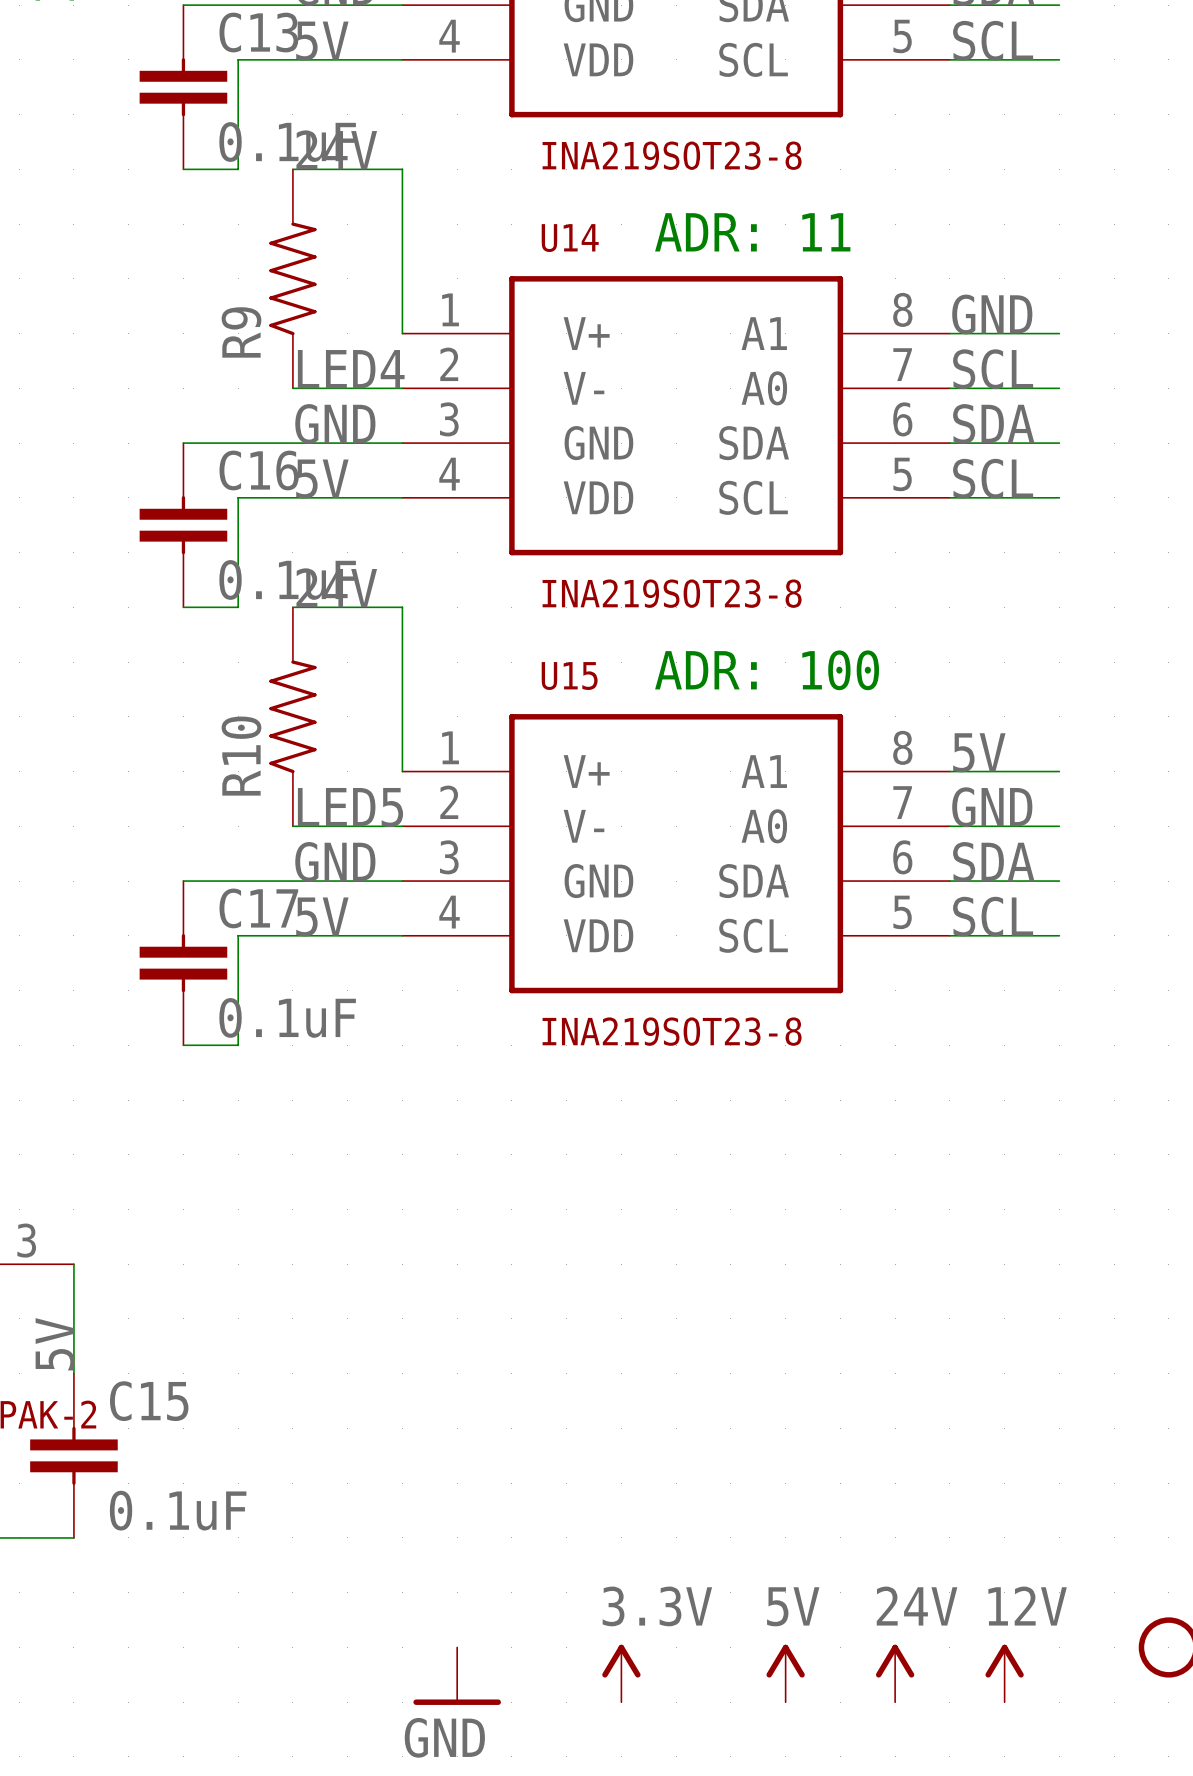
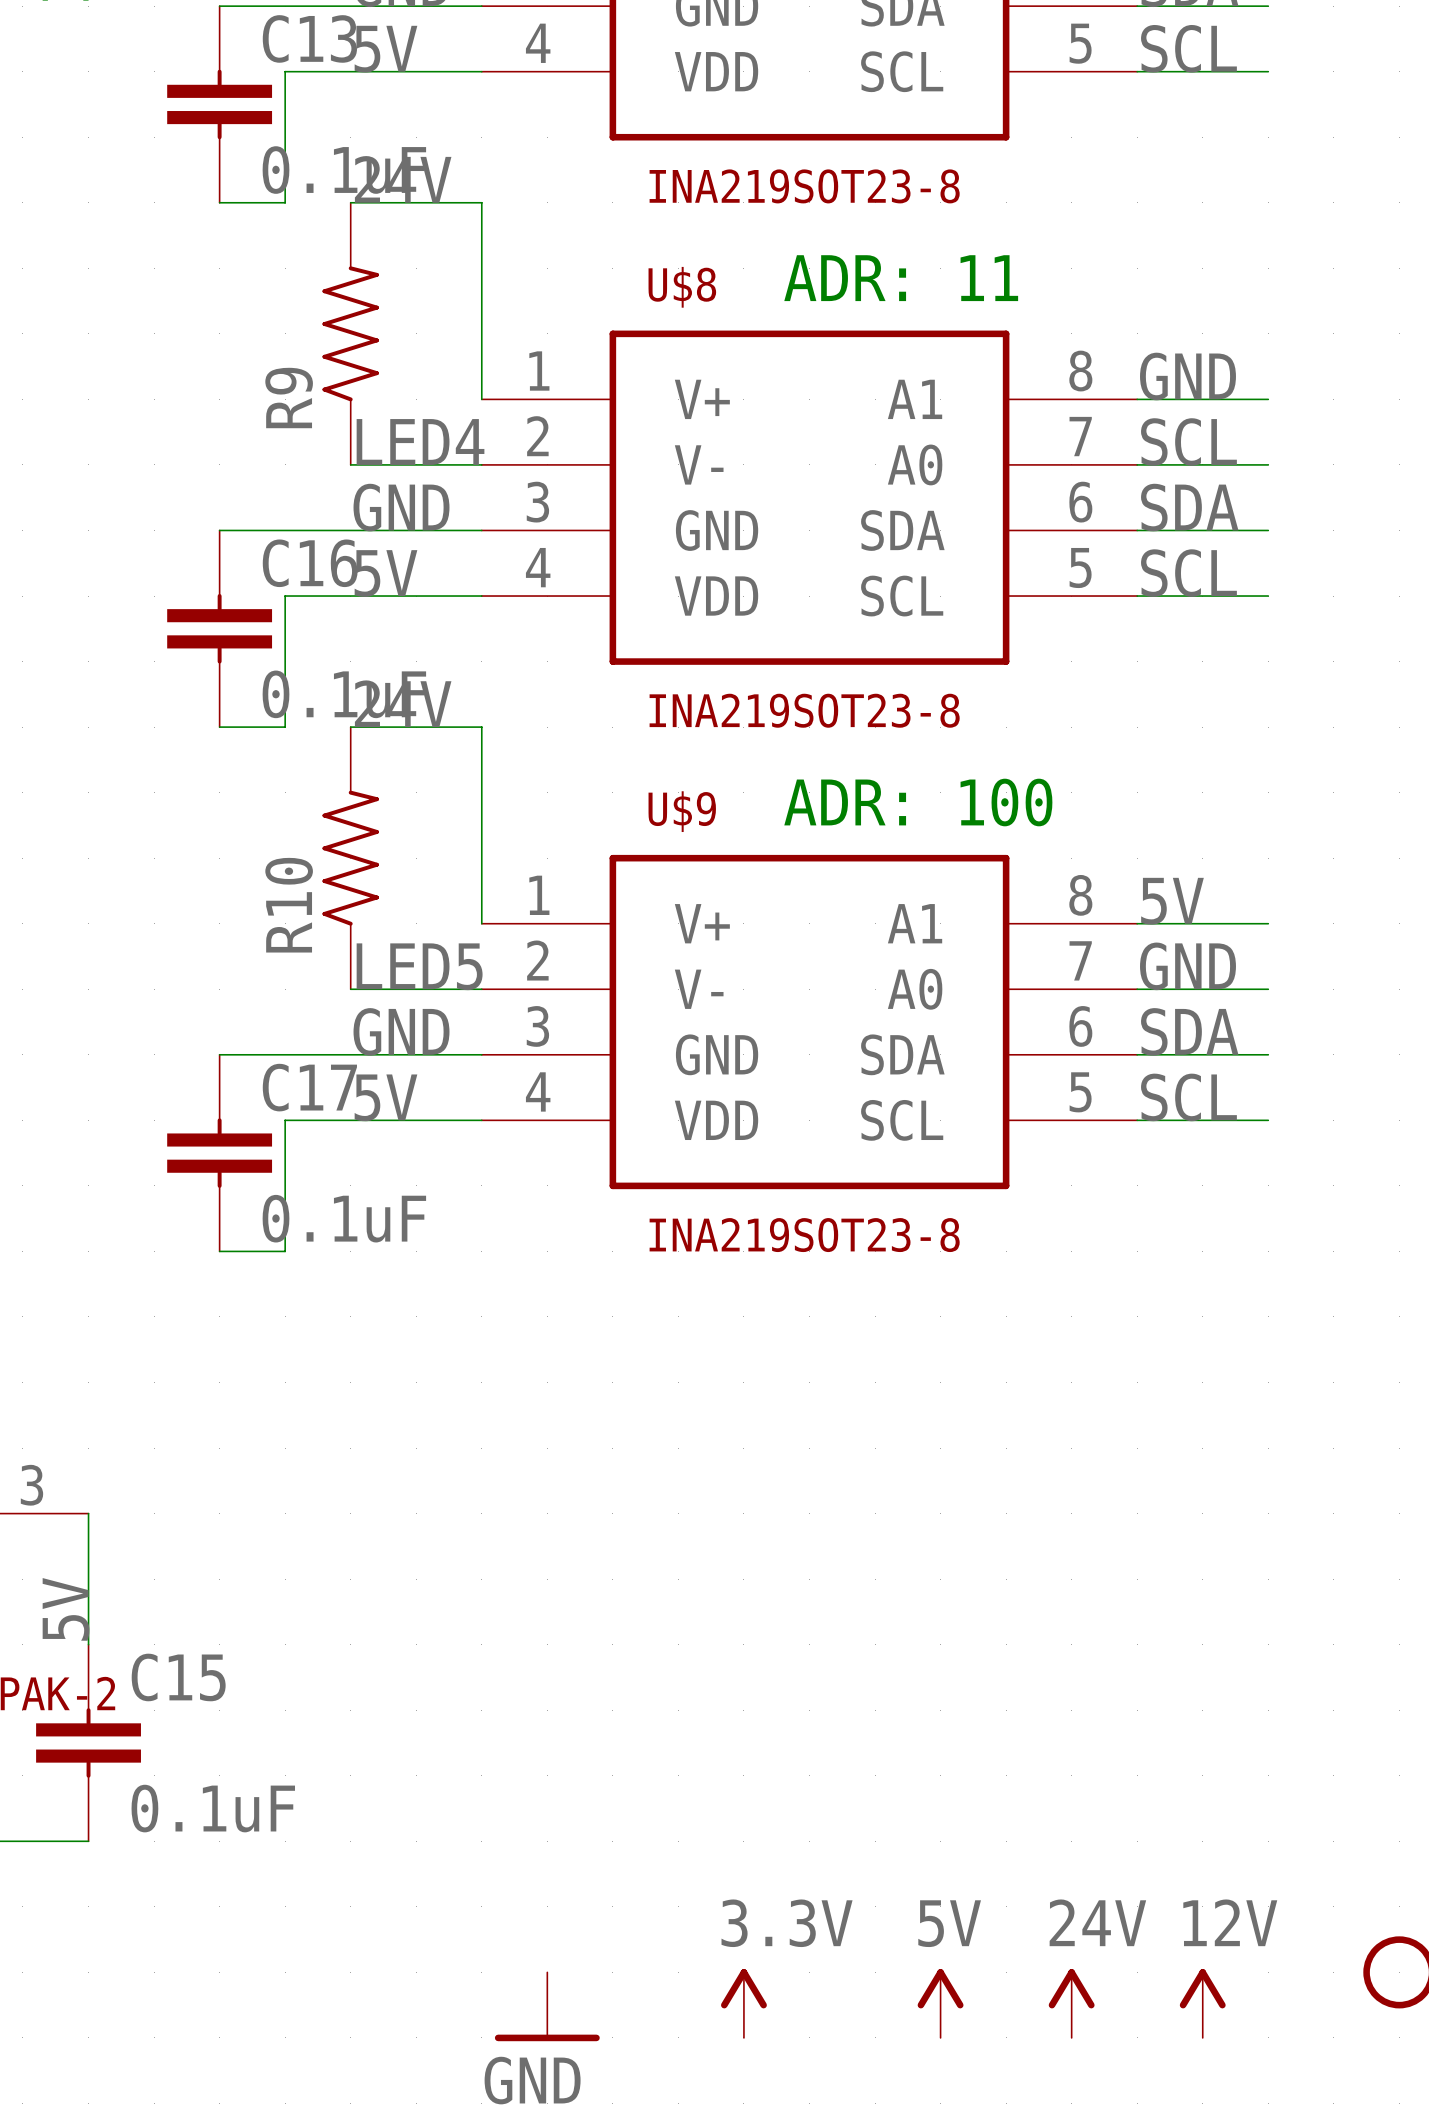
U14 name: U14 (570, 238) -> U$8 (682, 287)
U15 name: U15 (569, 676) -> U$9 (682, 811)

